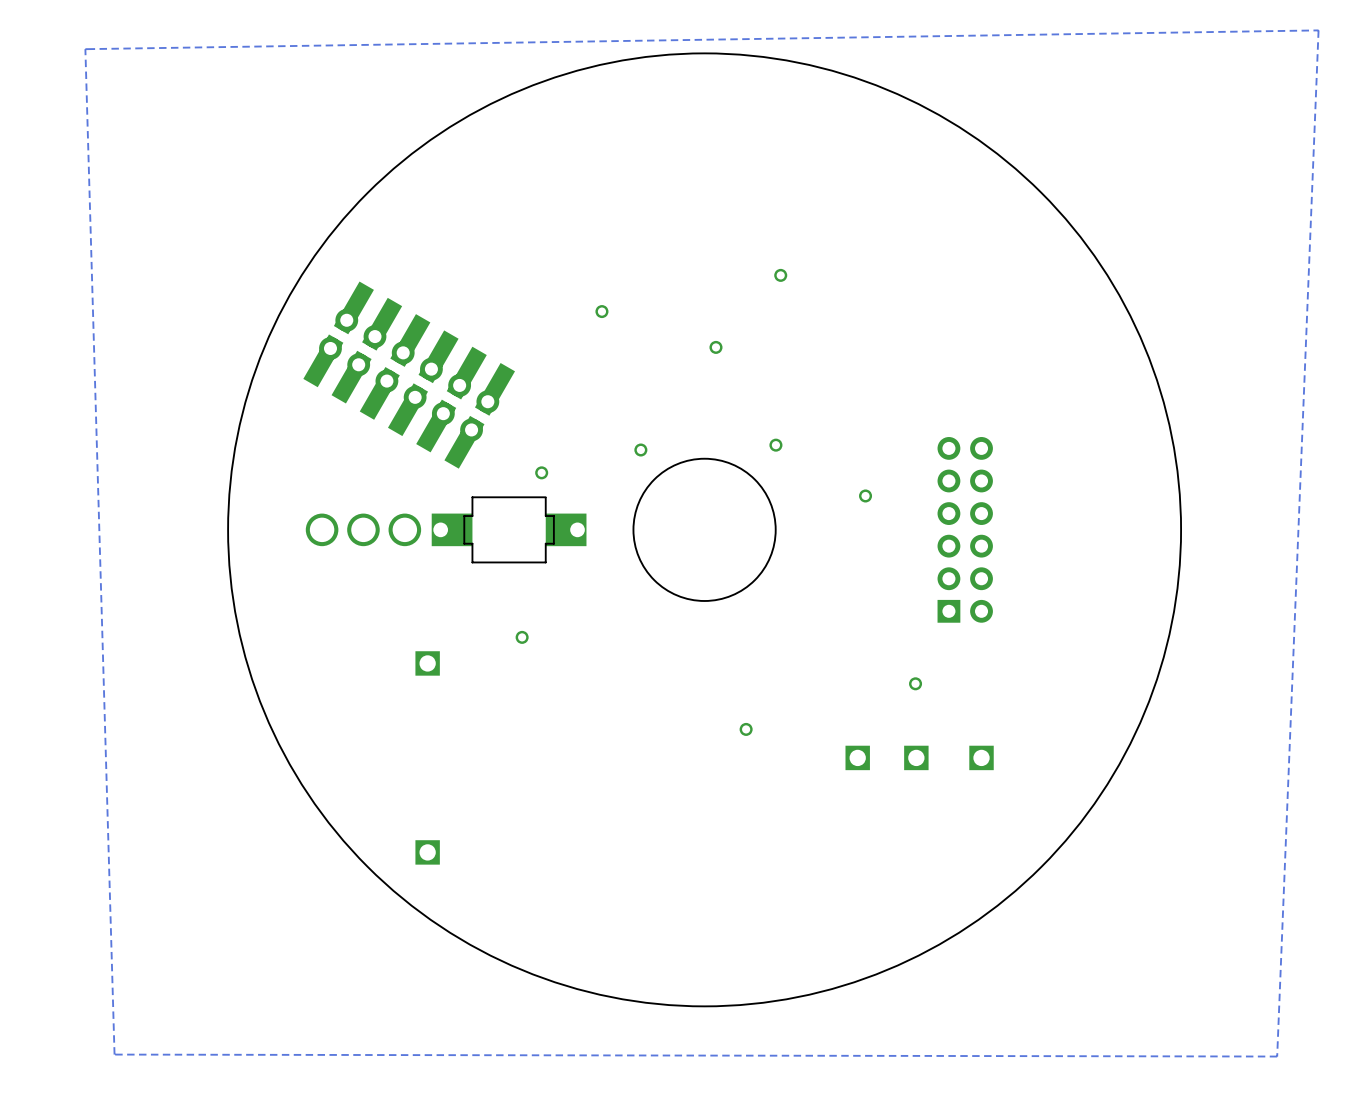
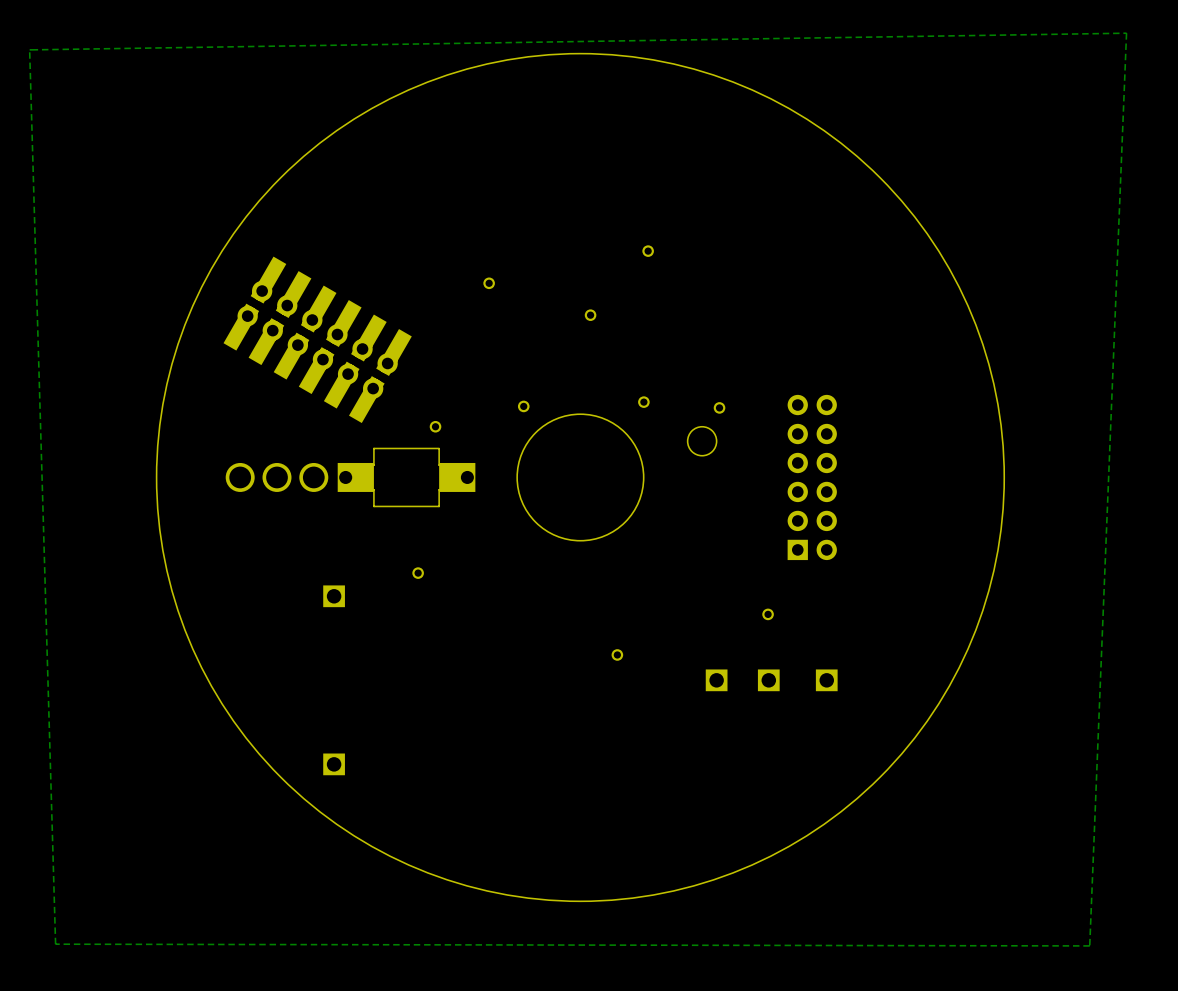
round board edge: none -> [686, 426, 718, 457]
part position: (865, 495) -> (719, 407)

